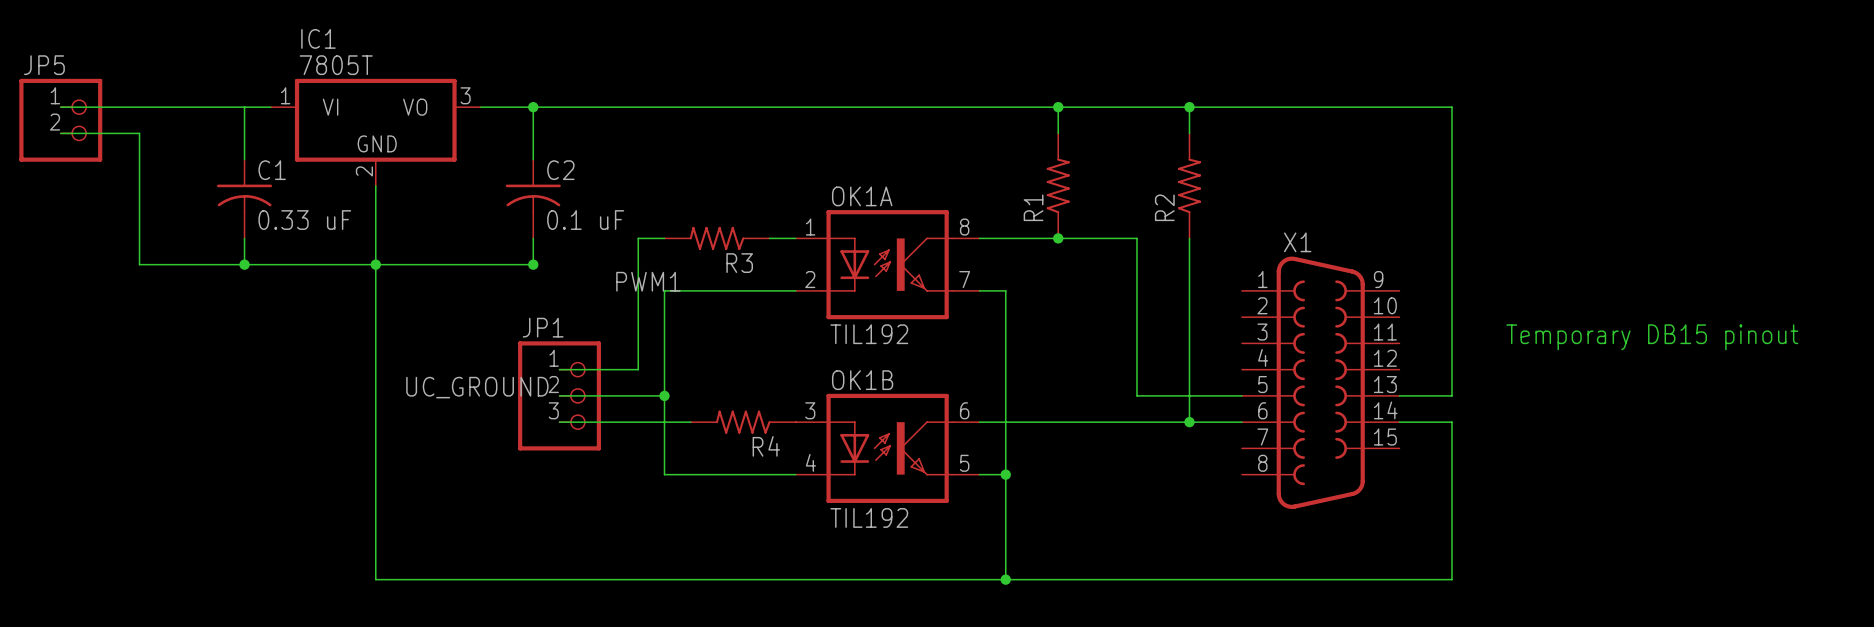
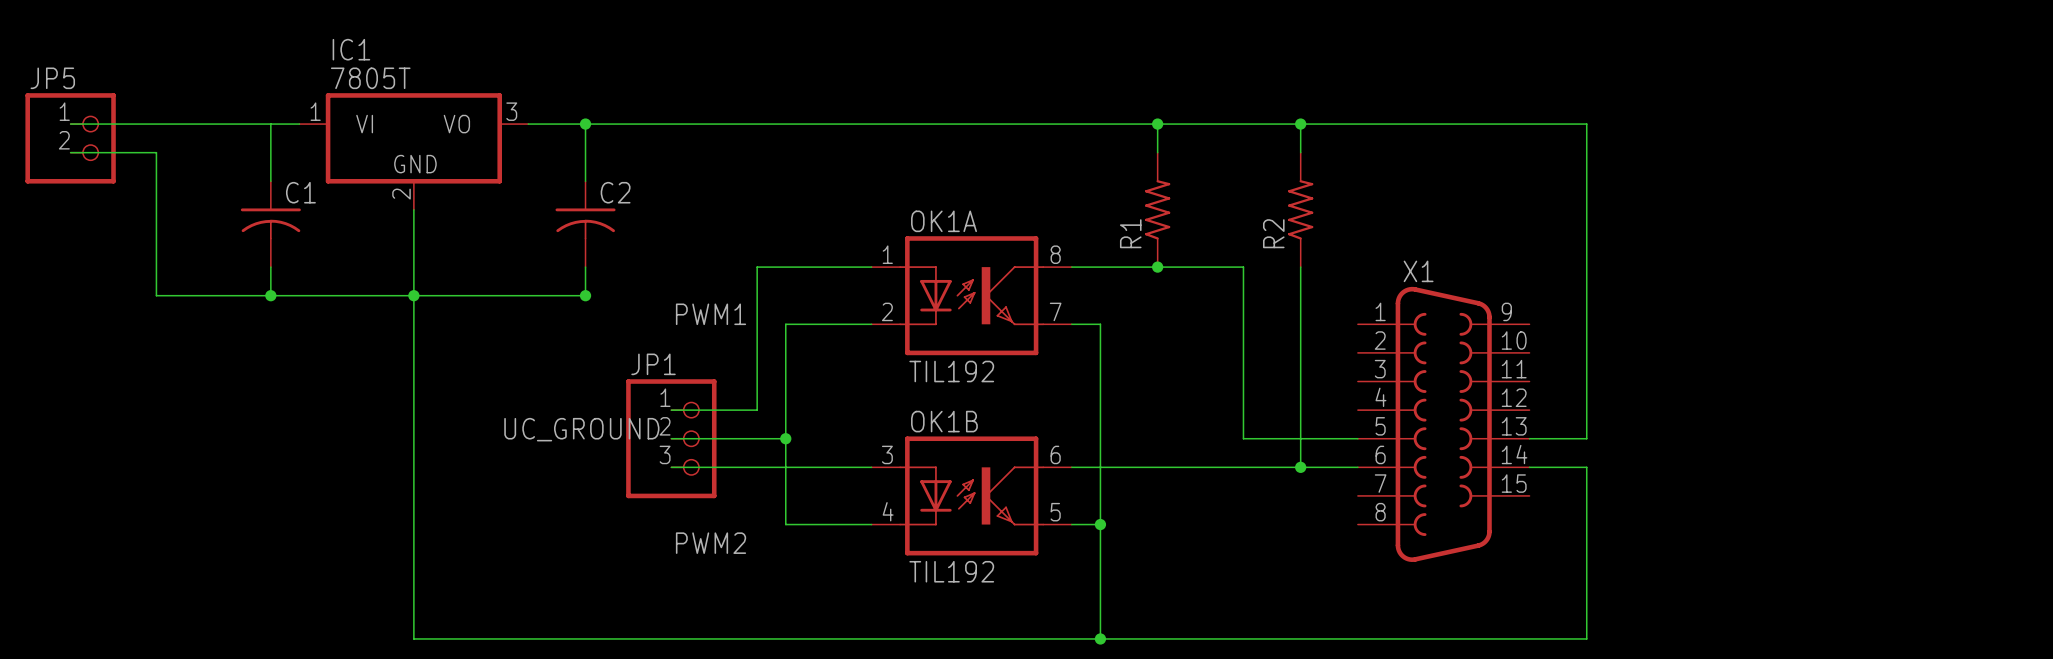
C1 value: 0.33 uF (304, 220) -> none
C2 value: 0.1 uF (585, 220) -> none
wire: (664, 238) (638, 238) (638, 369) -> (842, 267) (757, 267) (757, 410) (699, 410)
R3: (717, 238) -> none
wire: (717, 290) (664, 290) (664, 474) (717, 474) -> (785, 324) (785, 524)
text: Temporary DB15 pinout (1652, 337) -> none
wire: (559, 369) (612, 369) -> none
label position: UC_GROUND (477, 387) -> UC_GROUND (581, 429)
wire: (559, 395) (612, 395) -> (728, 438) (785, 438)
JP1 position: (559, 395) -> (671, 438)
junction position: (664, 395) -> (785, 438)
wire: (559, 422) (612, 422) -> none
R4: (743, 422) -> none
label: none -> PWM2 (711, 543)

